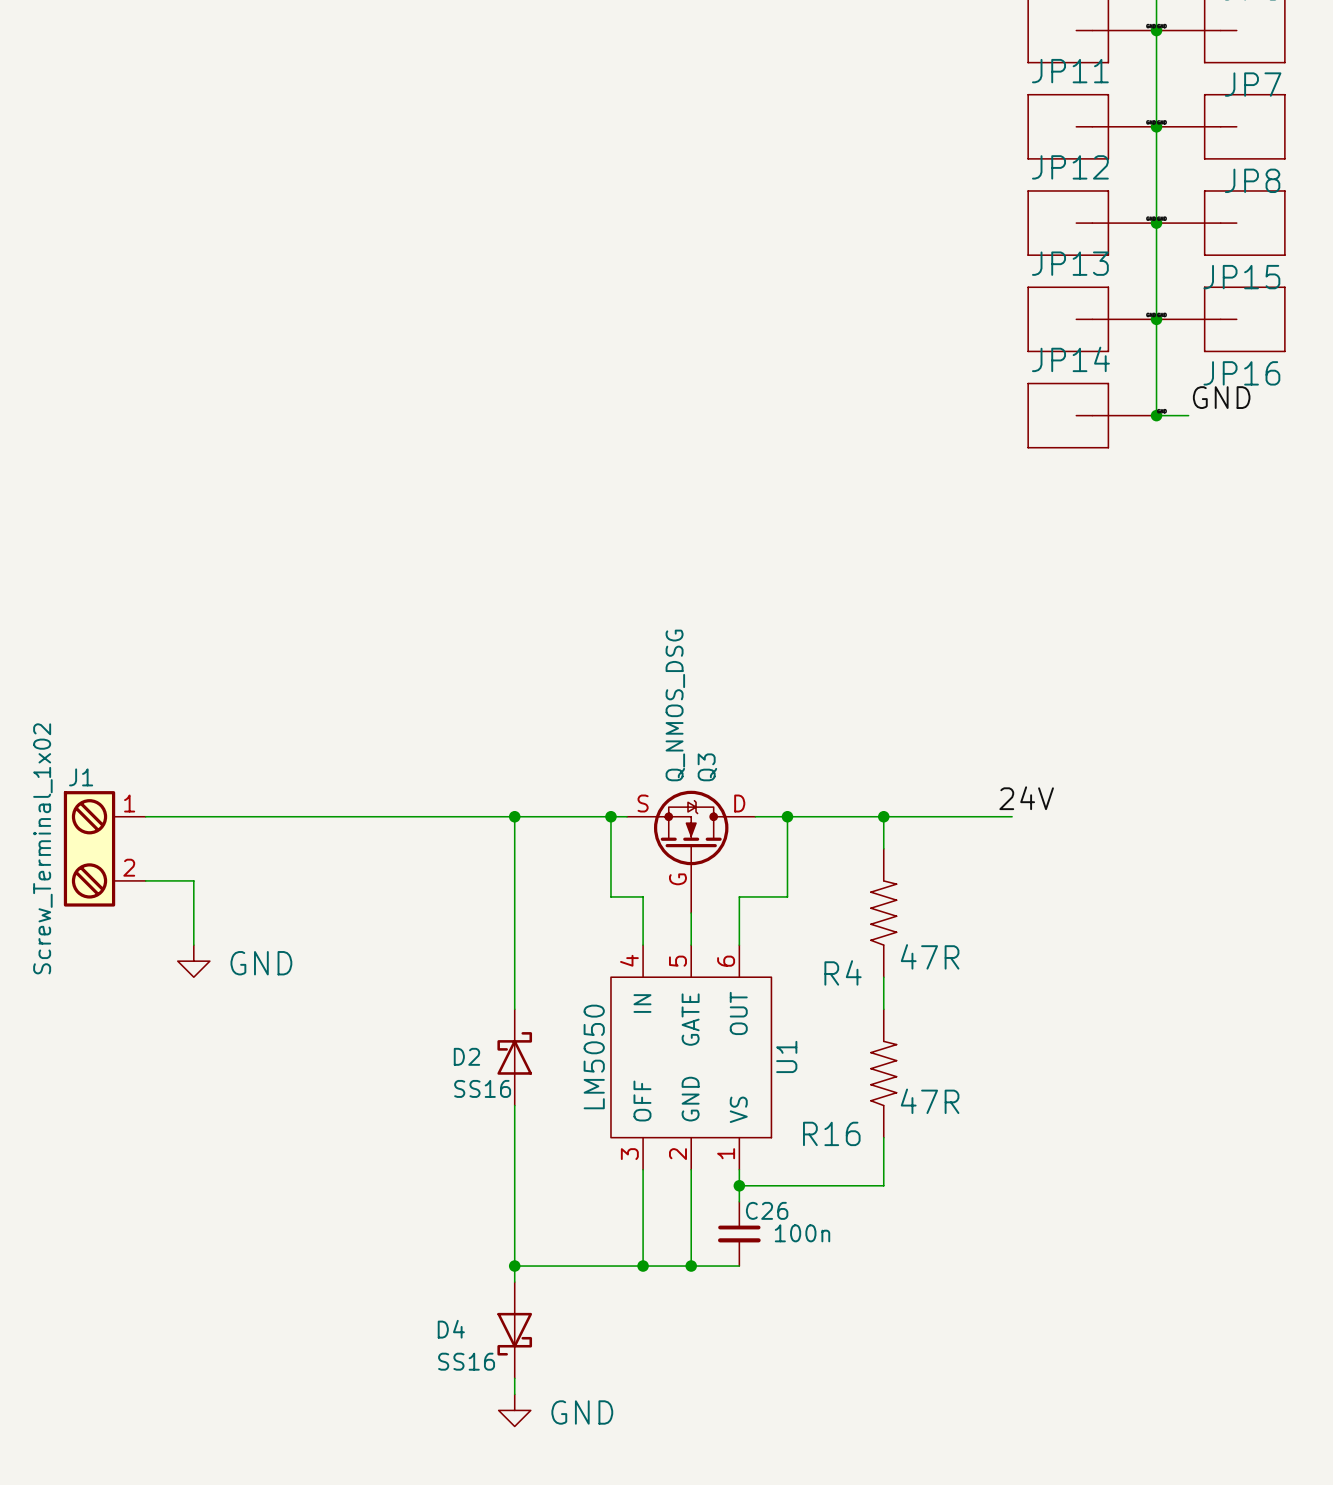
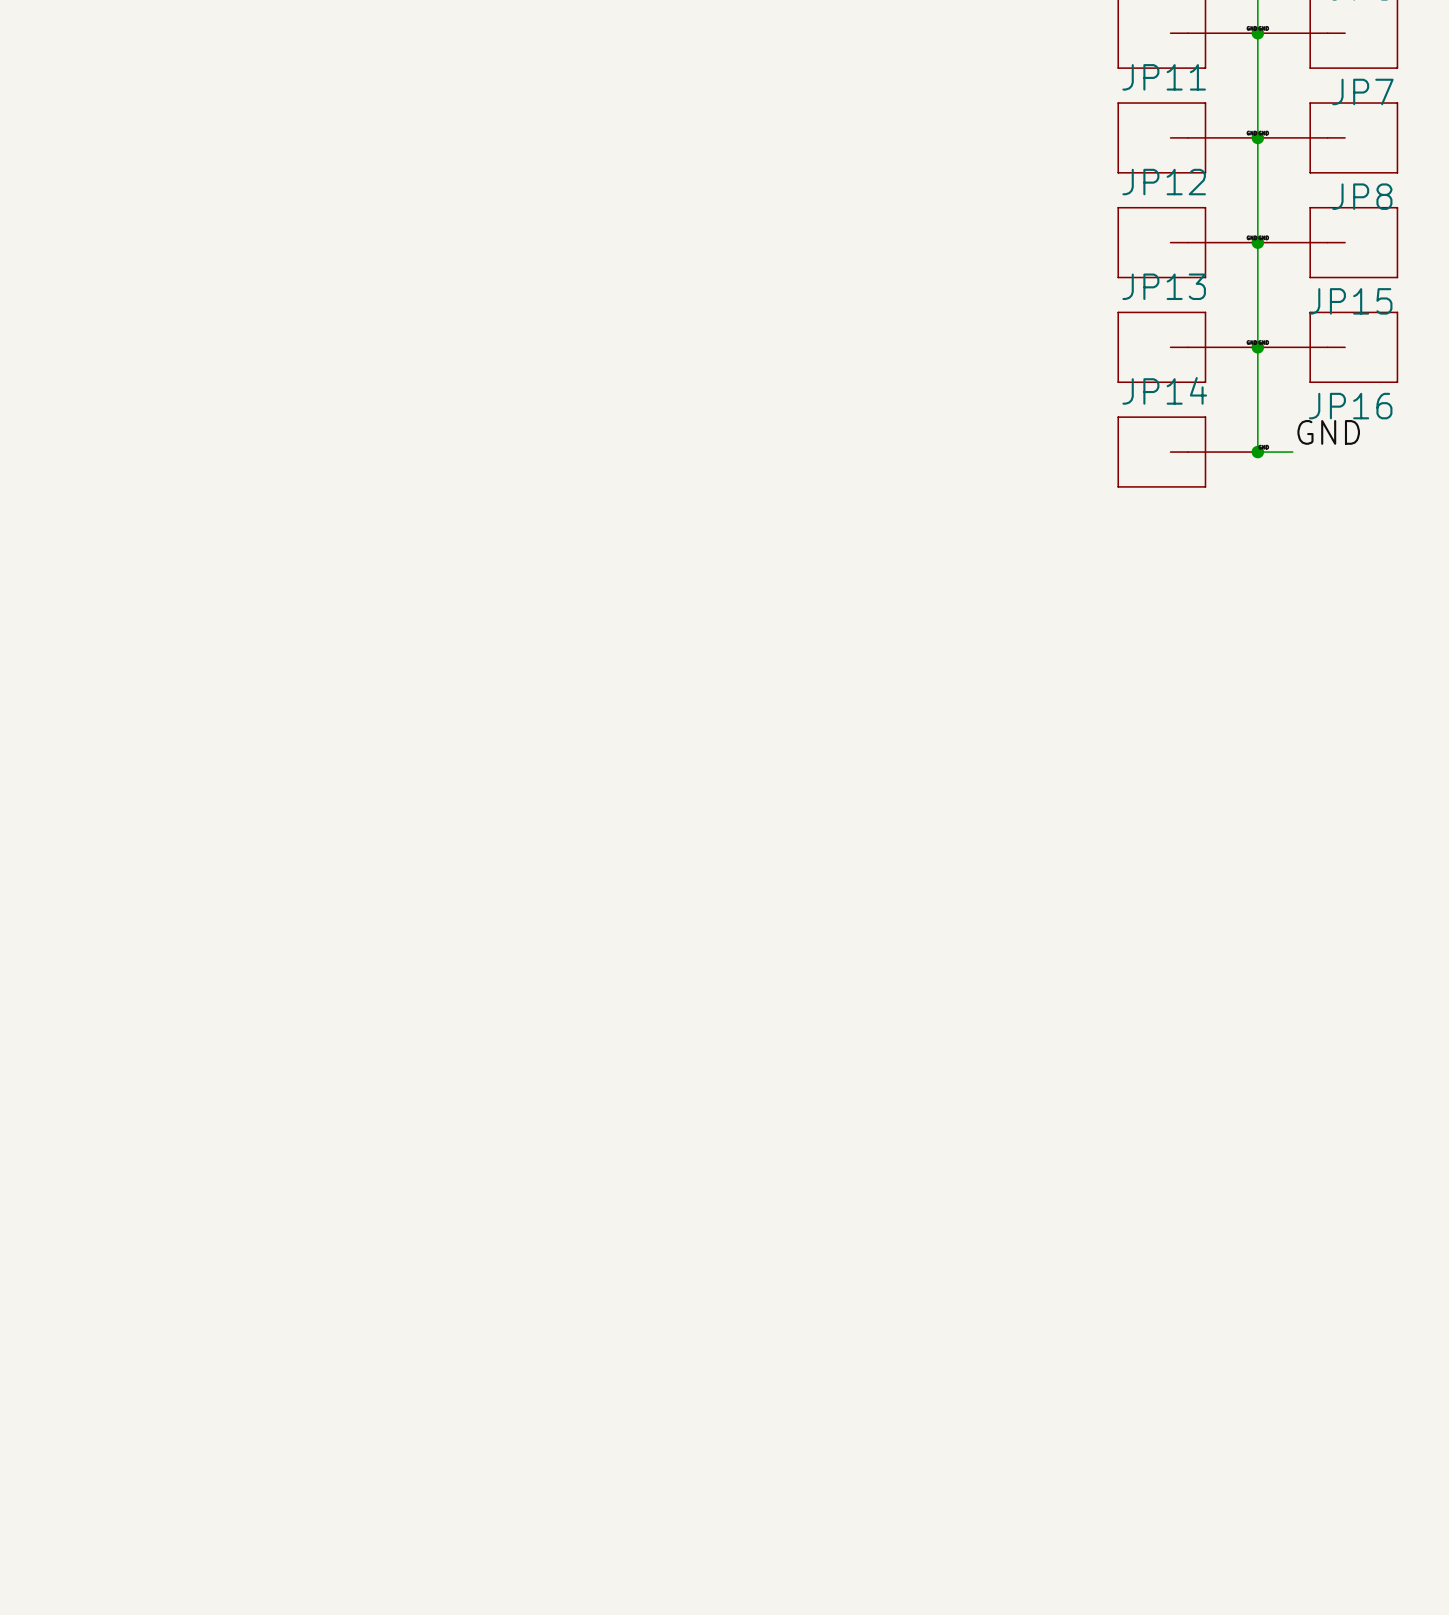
label: 24V (1026, 798) -> none
wire: (145, 816) (627, 816) -> none
wire: (514, 816) (514, 1009) -> none
junction: (514, 816) -> none
wire: (610, 816) (610, 896) (643, 896) (643, 945) -> none
junction: (610, 816) -> none
wire: (755, 816) (1012, 816) -> none
wire: (787, 816) (787, 896) (739, 896) (739, 945) -> none
junction: (787, 816) -> none
wire: (883, 816) (883, 848) -> none
junction: (883, 816) -> none
J1: Screw_Terminal_1x02 (104, 848) -> none
Q3: Q_NMOS_DSG (691, 851) -> none
wire: (145, 880) (193, 880) (193, 945) -> none
wire: (691, 913) (691, 945) -> none
R4: 47R (883, 913) -> none
power symbol: GND (193, 961) -> none
wire: (883, 977) (883, 1009) -> none
D2: SS16 (514, 1057) -> none
U1: LM5050 (691, 1057) -> none
R16: 47R (883, 1073) -> none
wire: (514, 1105) (514, 1282) -> none
wire: (883, 1137) (883, 1185) (739, 1185) -> none
wire: (643, 1169) (643, 1266) -> none
wire: (691, 1169) (691, 1266) -> none
wire: (739, 1169) (739, 1201) -> none
junction: (739, 1185) -> none
C26: 100n (739, 1233) -> none
wire: (514, 1266) (739, 1266) -> none
junction: (514, 1266) -> none
junction: (643, 1266) -> none
junction: (691, 1266) -> none
D4: SS16 (514, 1330) -> none
wire: (514, 1378) (514, 1394) -> none
power symbol: GND (514, 1410) -> none

